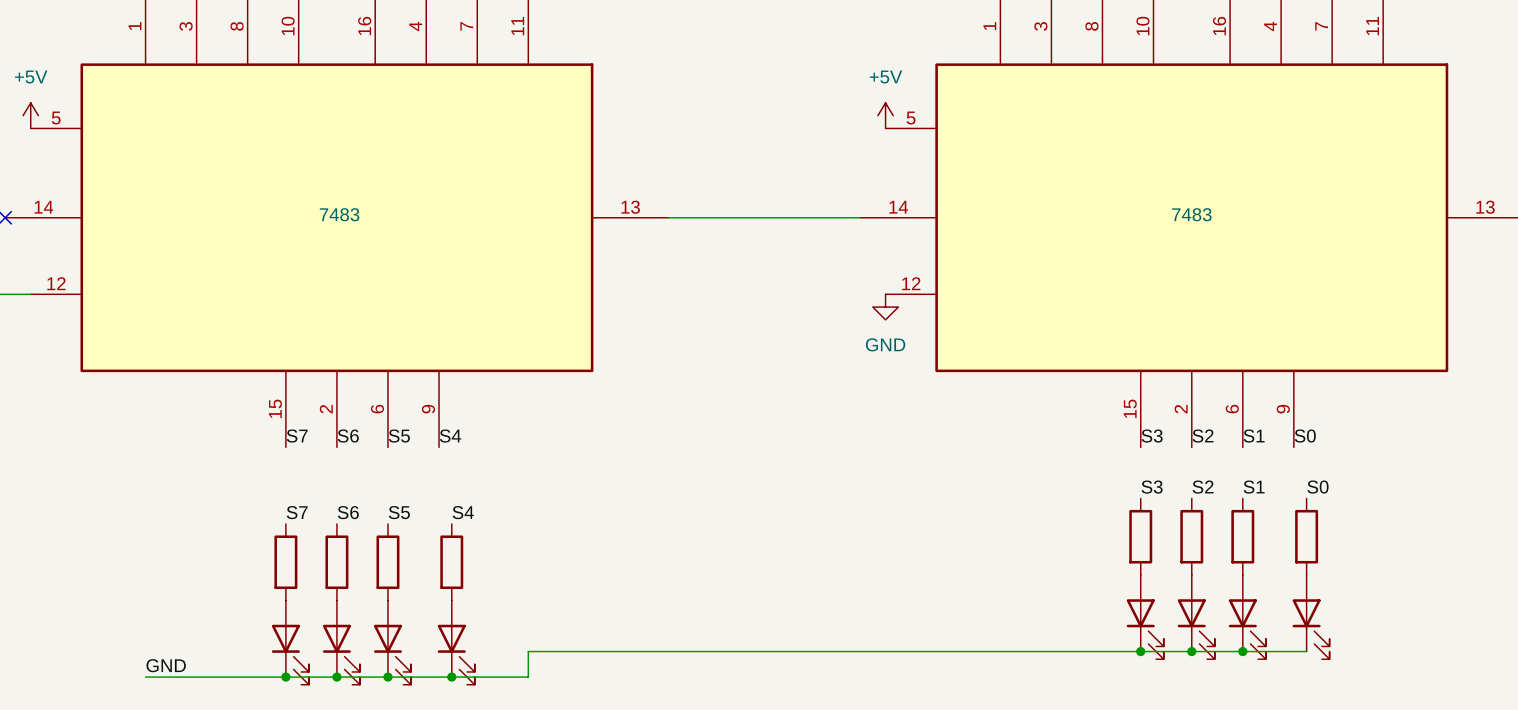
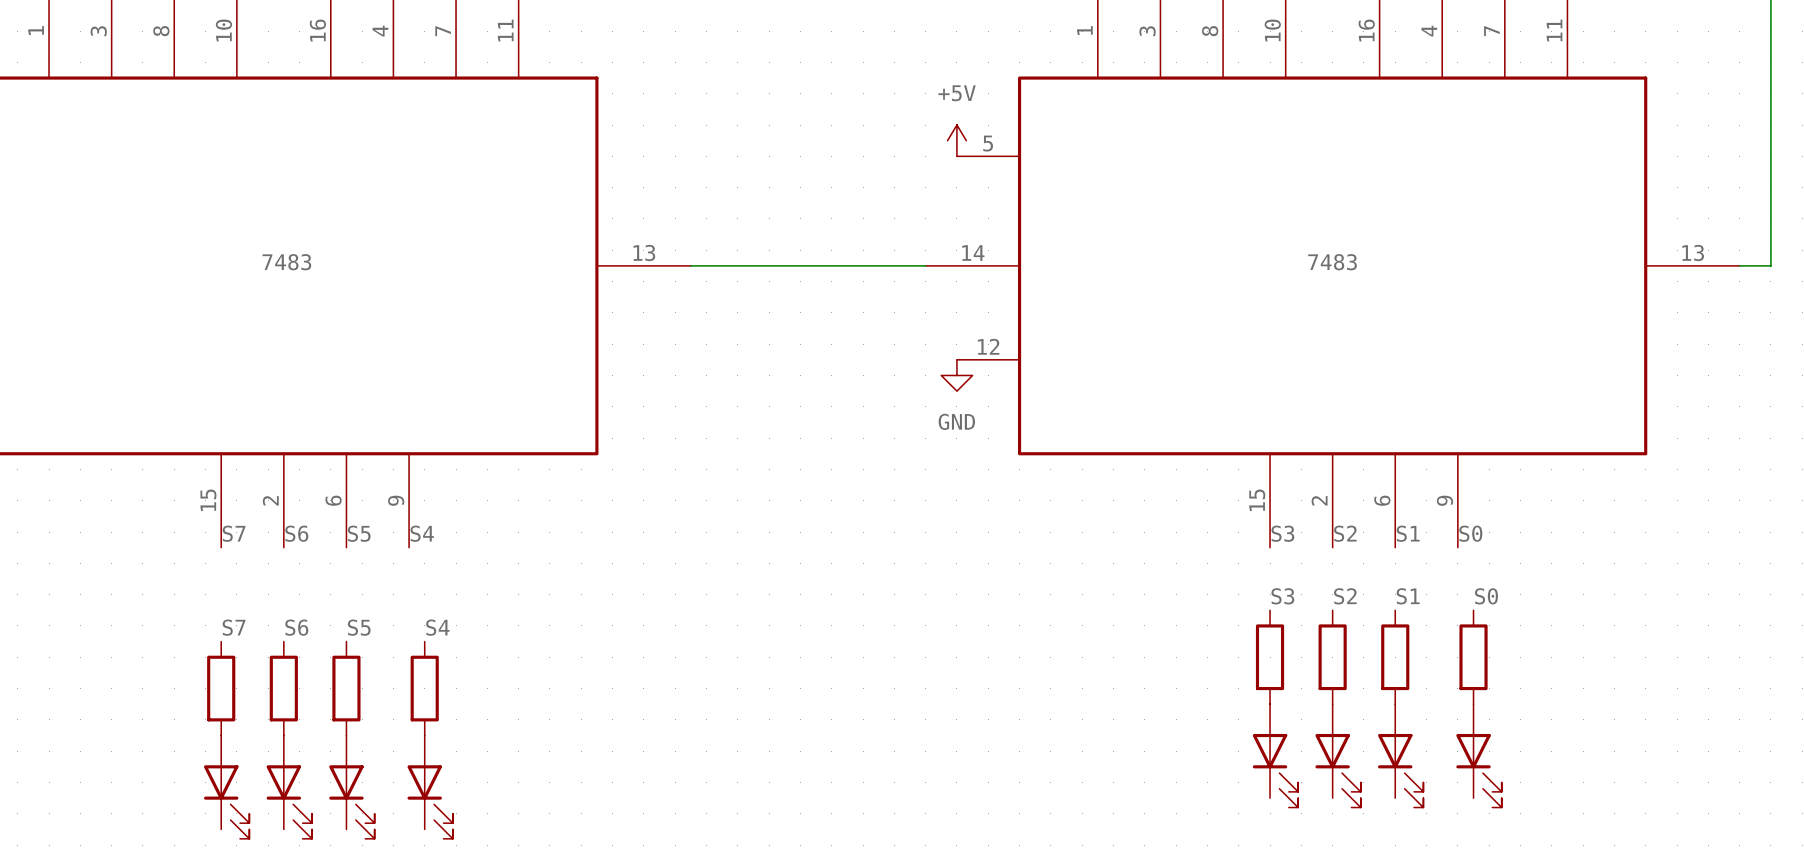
junction: (1140, 651) -> none
junction: (1191, 651) -> none
junction: (1242, 651) -> none
wire: (1306, 651) (528, 651) (528, 677) (145, 677) -> none
label: GND (166, 665) -> none
junction: (285, 677) -> none
junction: (336, 677) -> none
junction: (387, 677) -> none
junction: (451, 677) -> none

